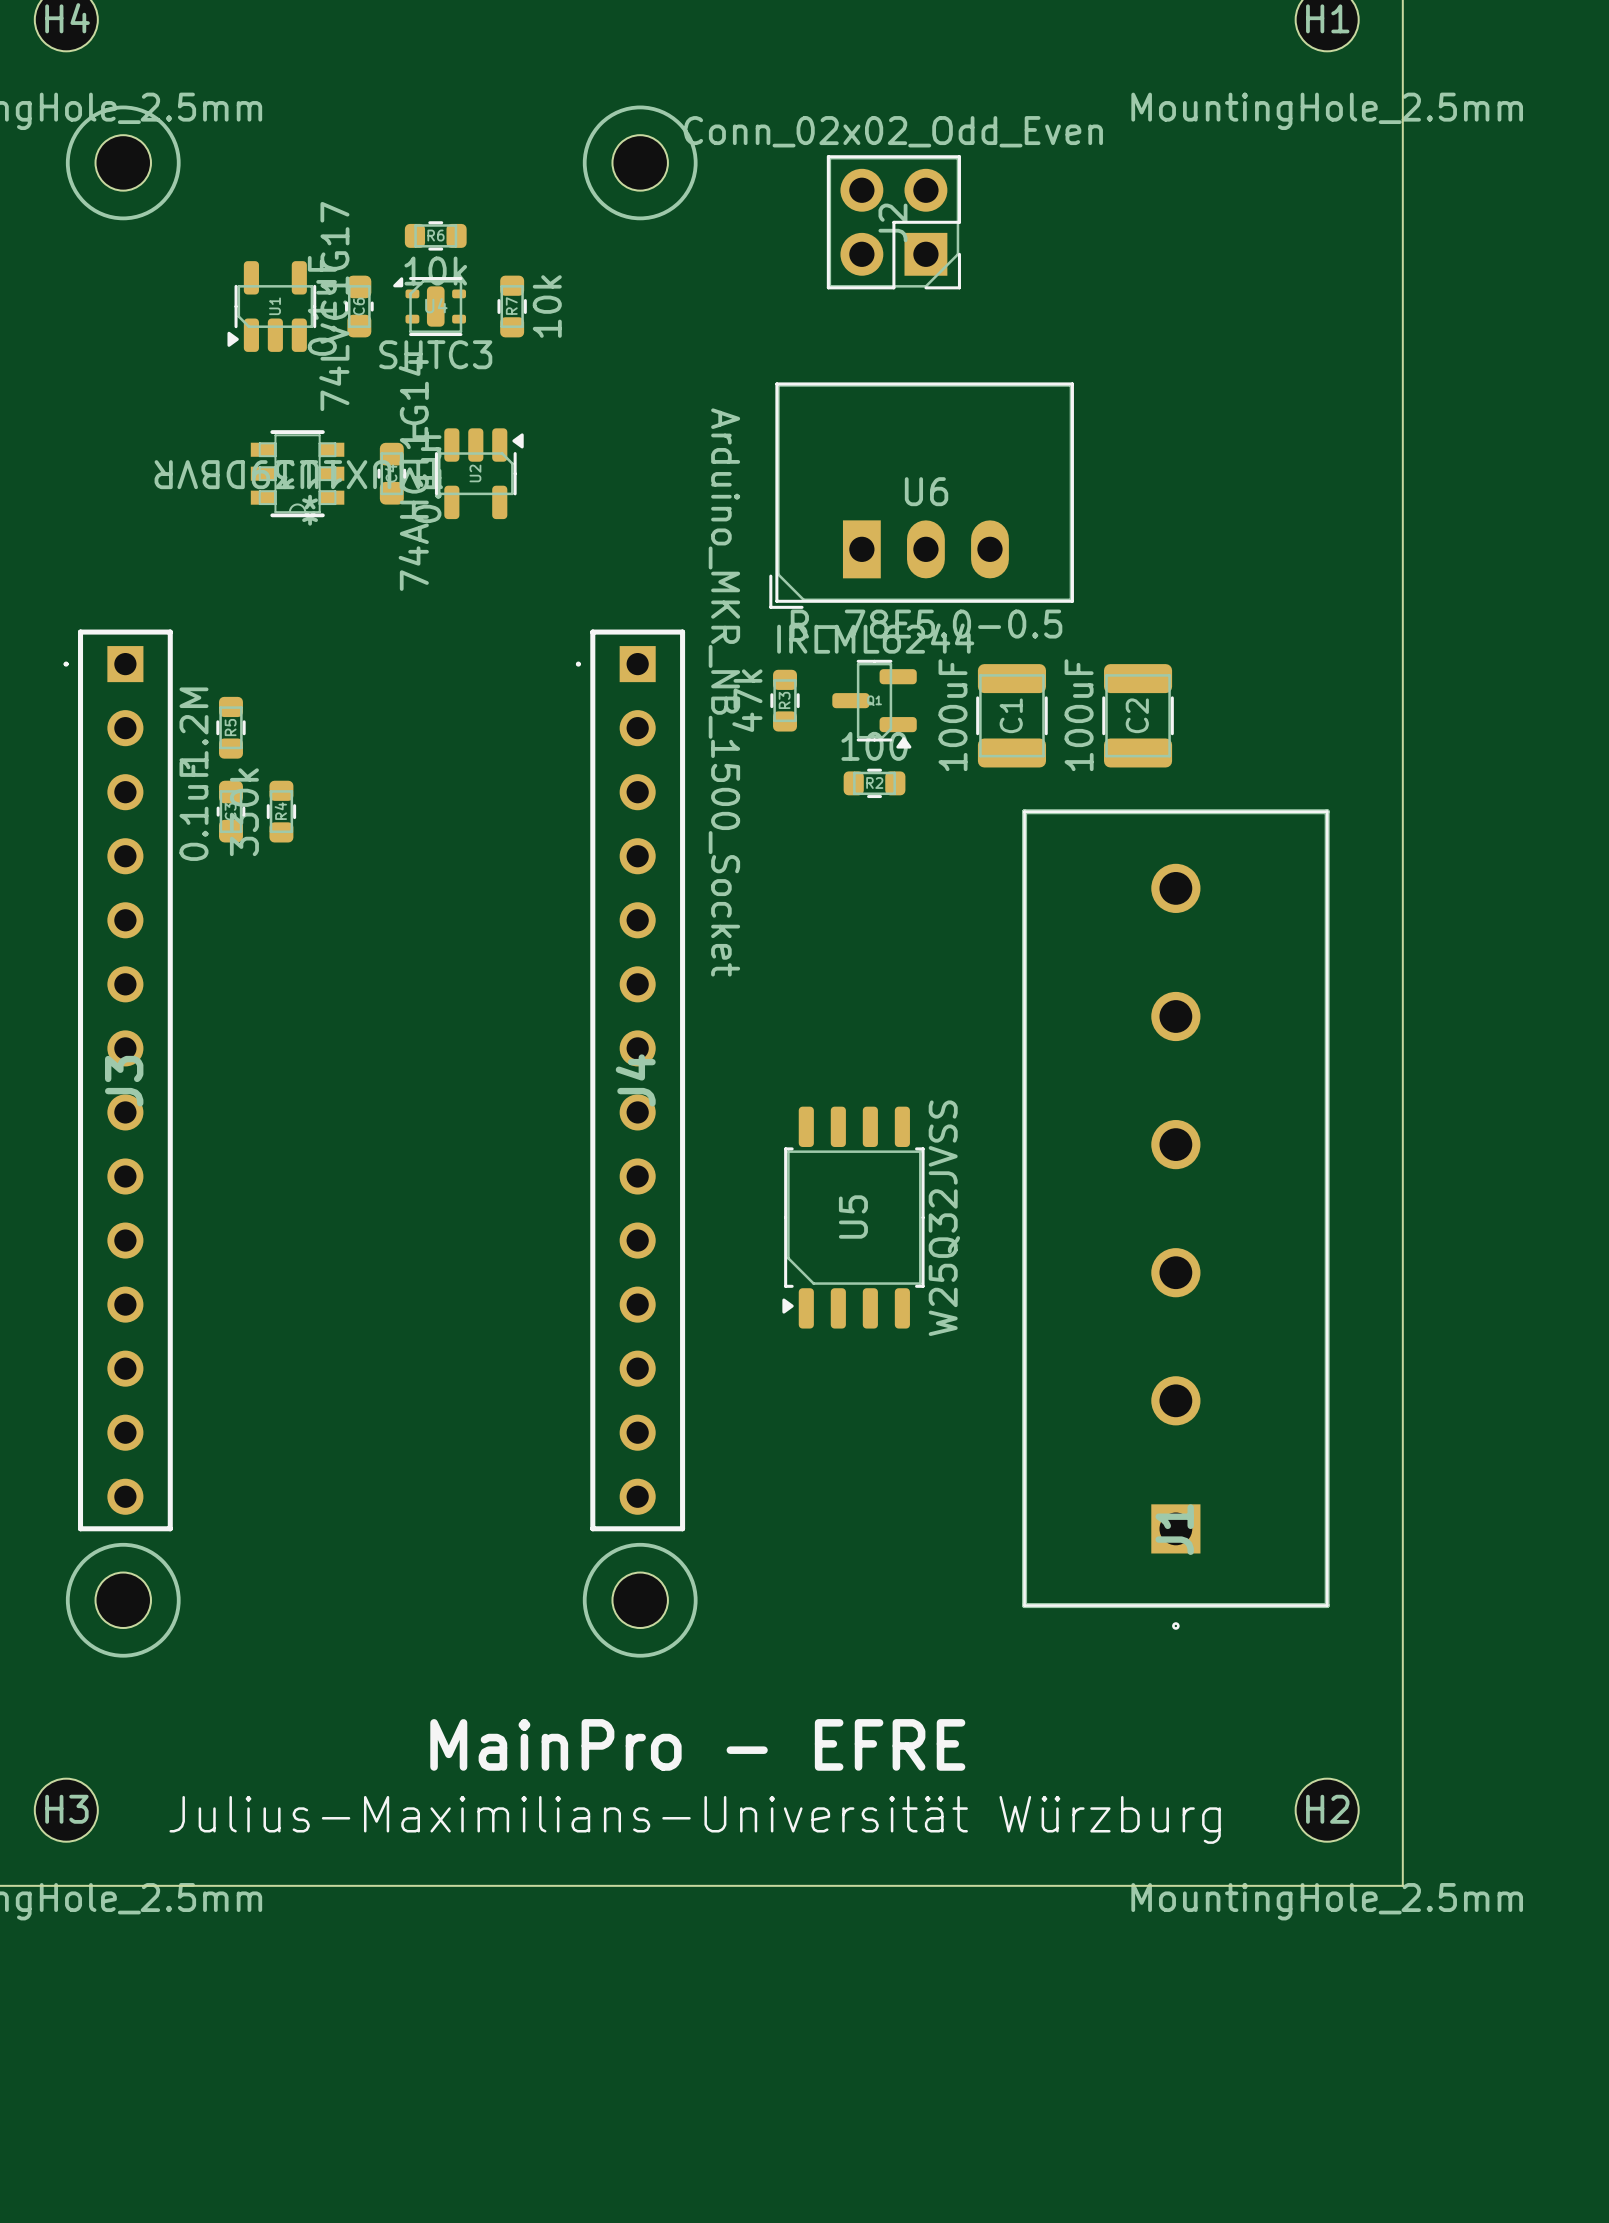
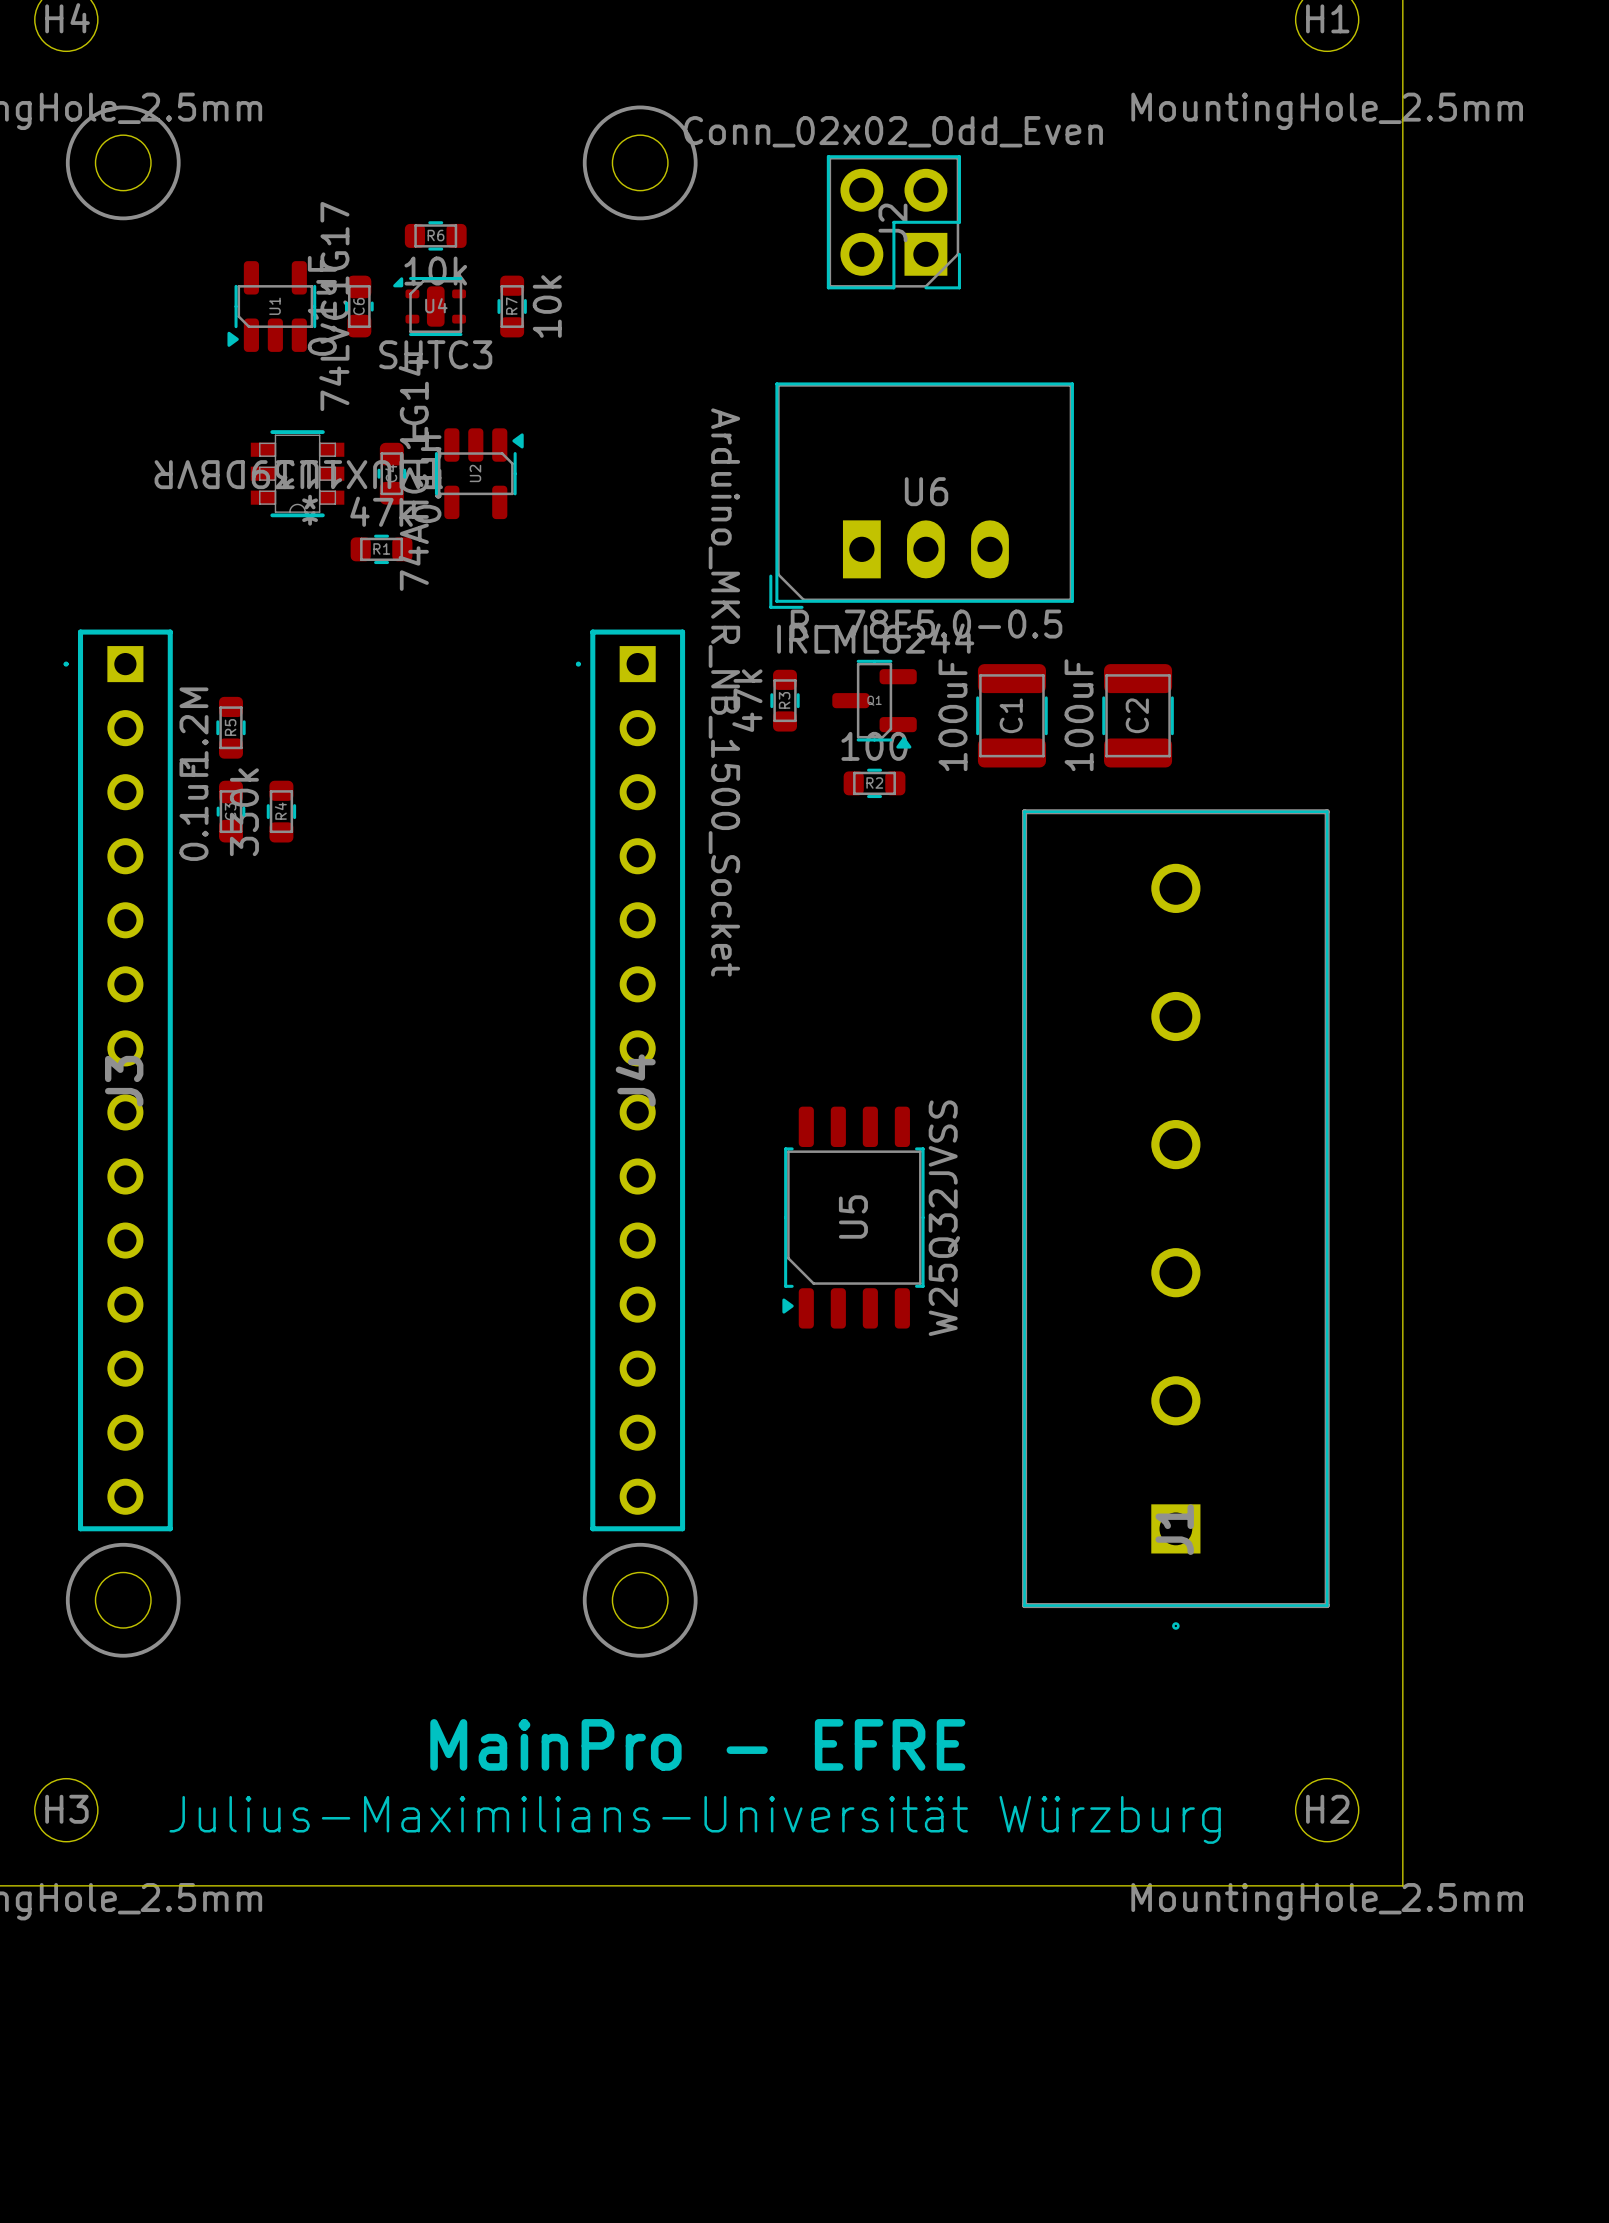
R1: none -> 47k (381, 549)

